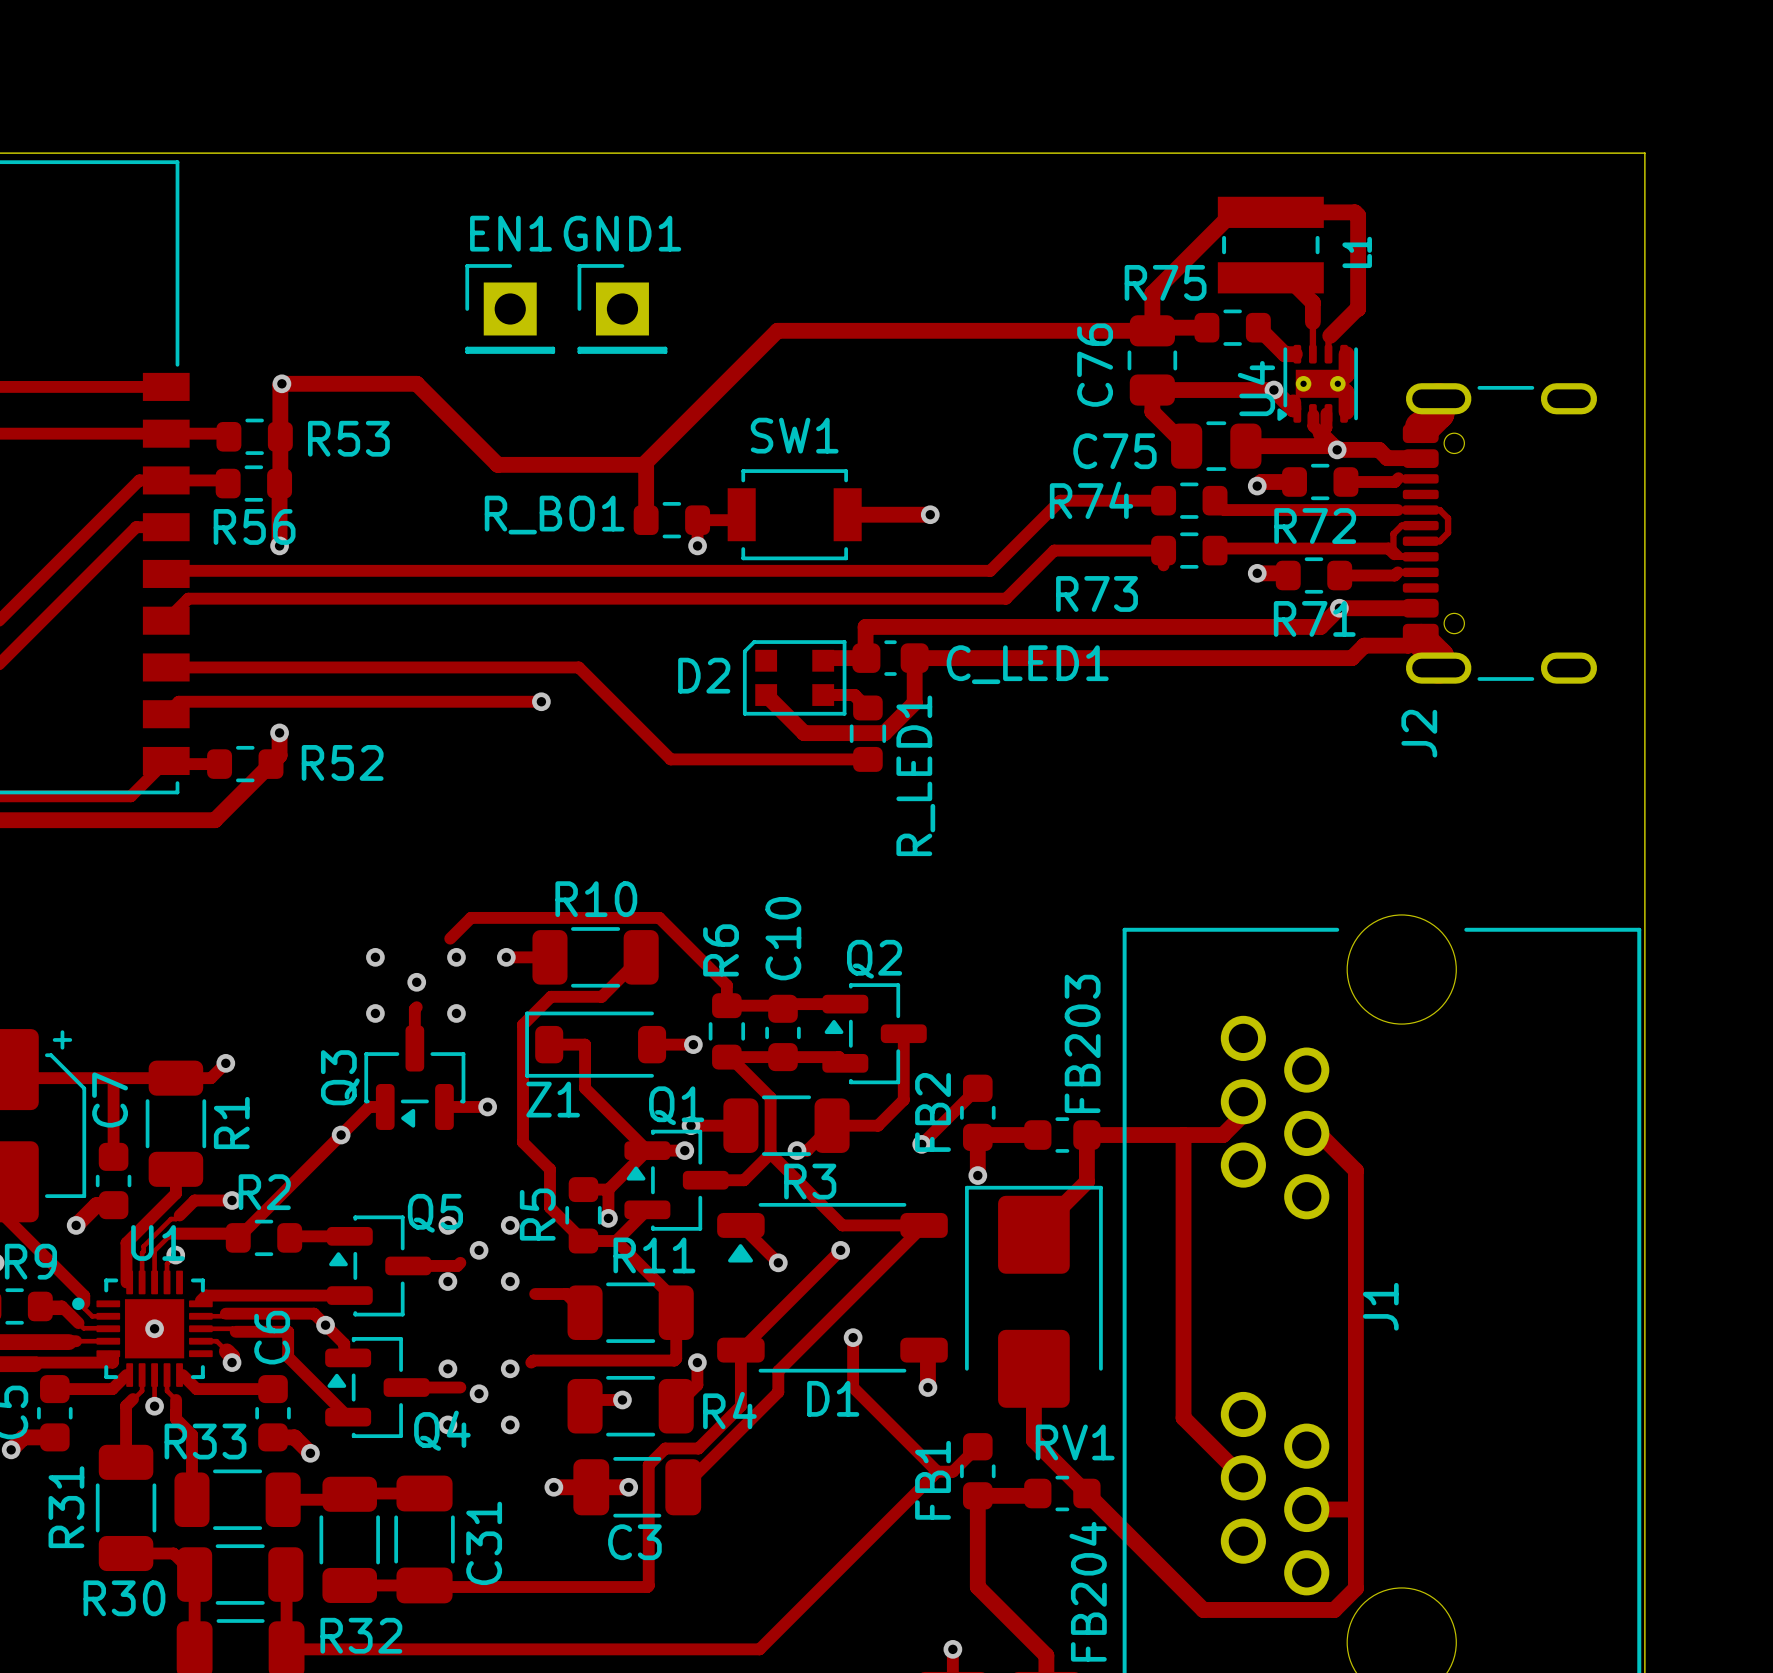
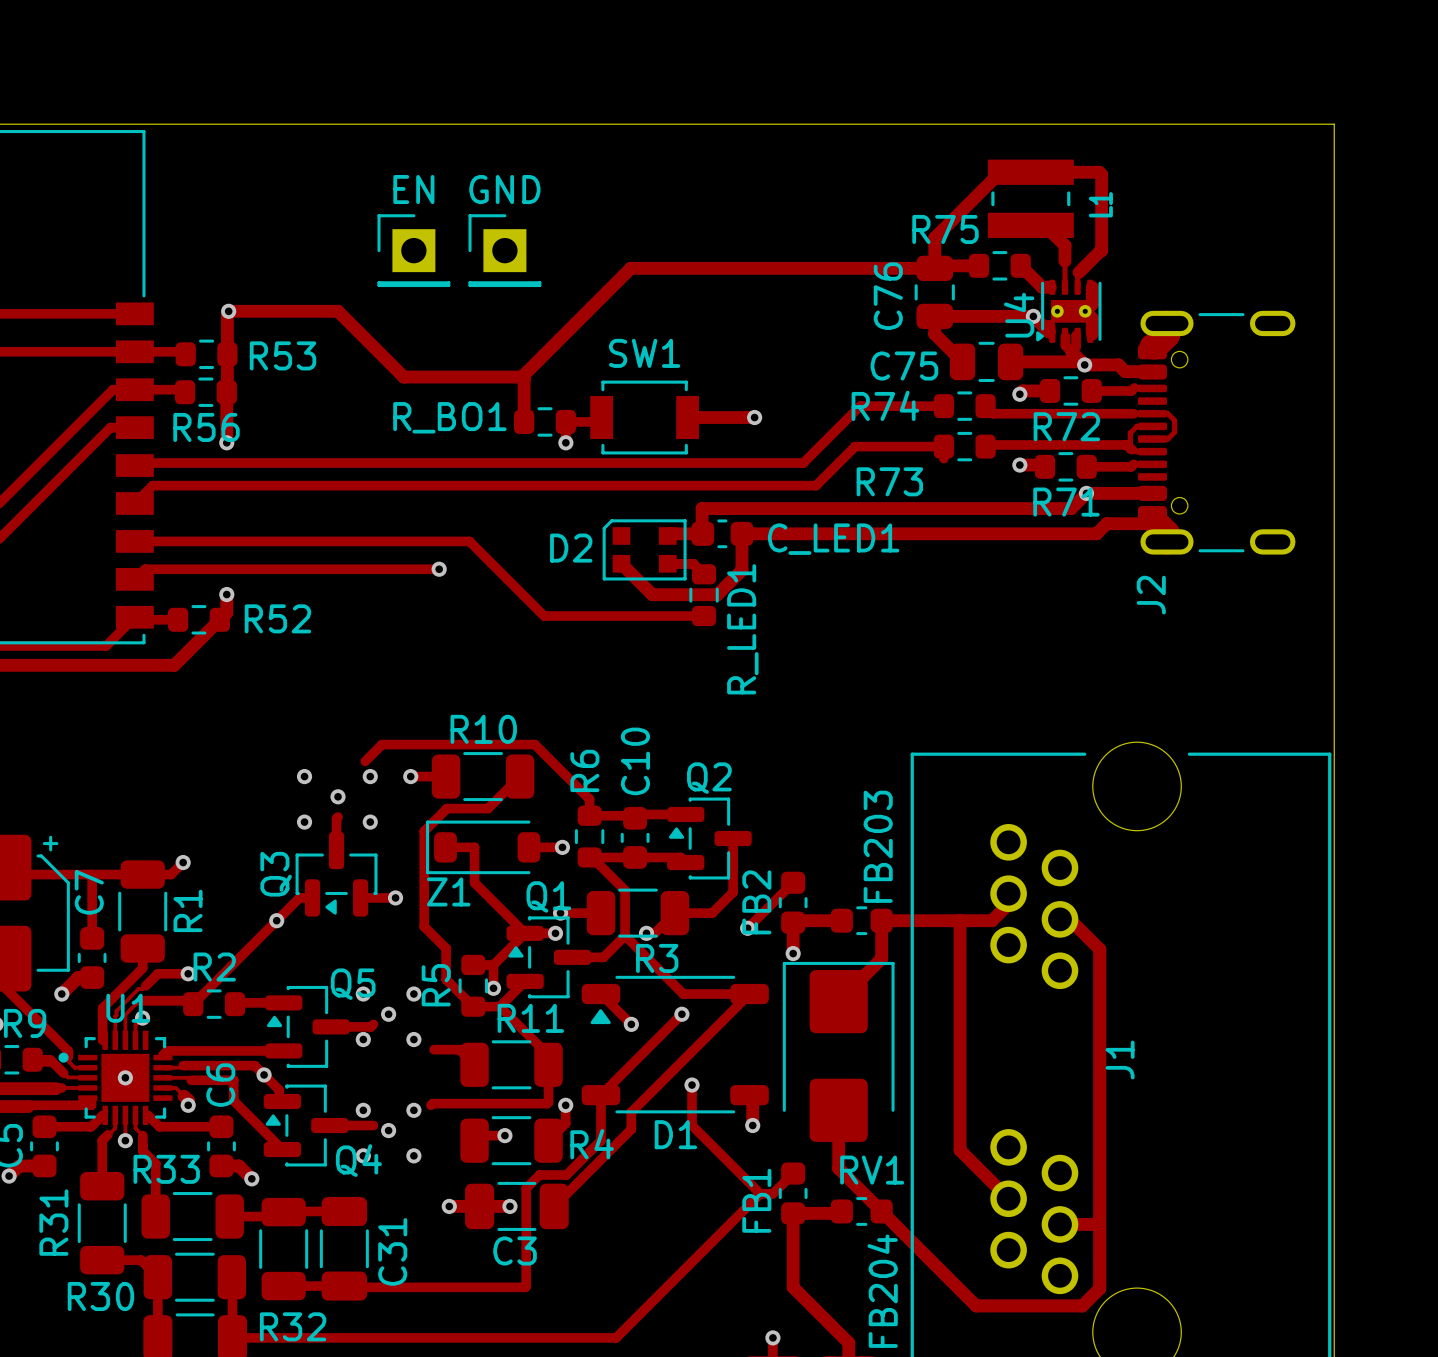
EN1 name: EN1 (510, 233) -> EN (413, 189)
GND1 name: GND1 (622, 233) -> GND (504, 189)

